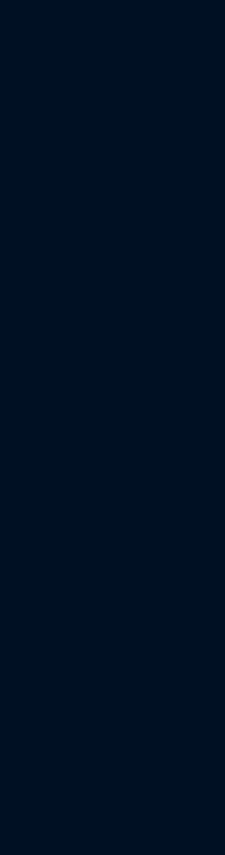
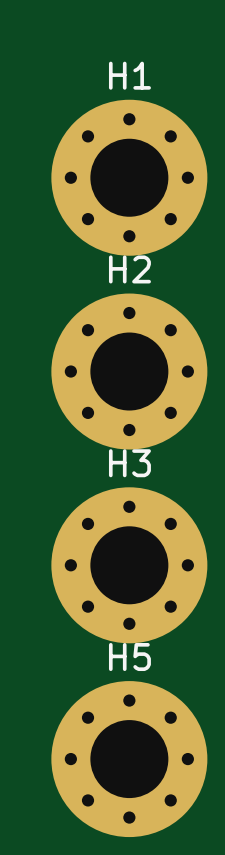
H1: none -> (129, 177)
H2: none -> (129, 371)
H3: none -> (129, 565)
H5: none -> (129, 759)

